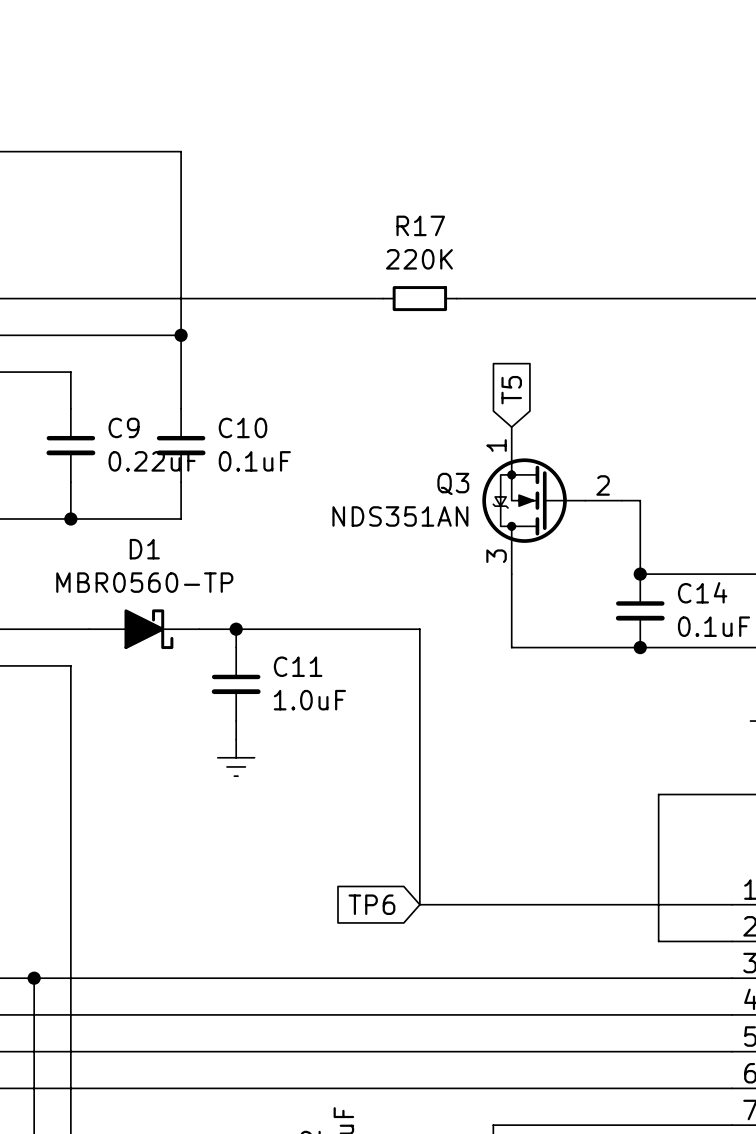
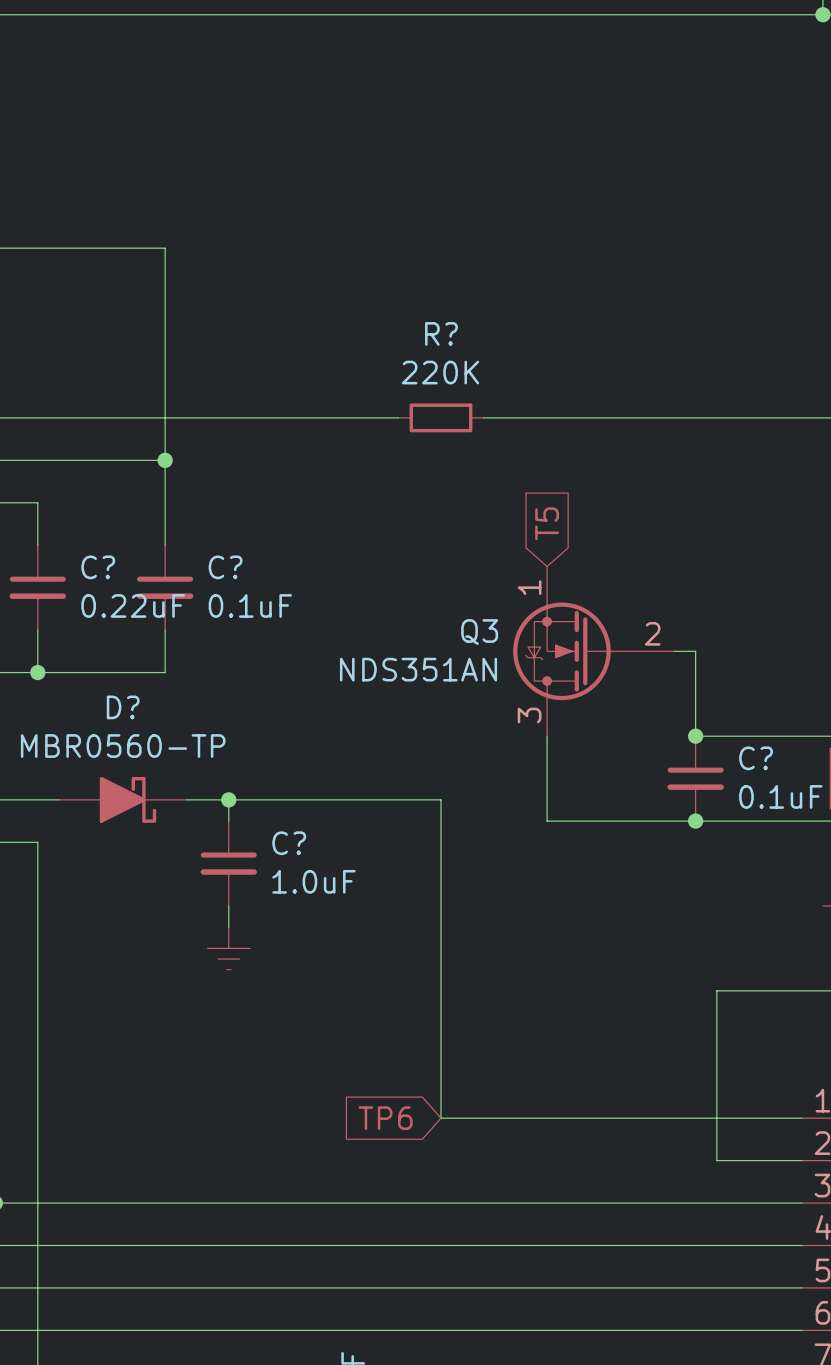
R17 name: R17 (420, 225) -> R? (441, 333)
C9 name: C9 (124, 427) -> C? (98, 567)
C10 name: C10 (243, 427) -> C? (225, 567)
D1 name: D1 (144, 549) -> D? (123, 707)
C14 name: C14 (702, 592) -> C? (756, 758)
C11 name: C11 (298, 666) -> C? (289, 843)

